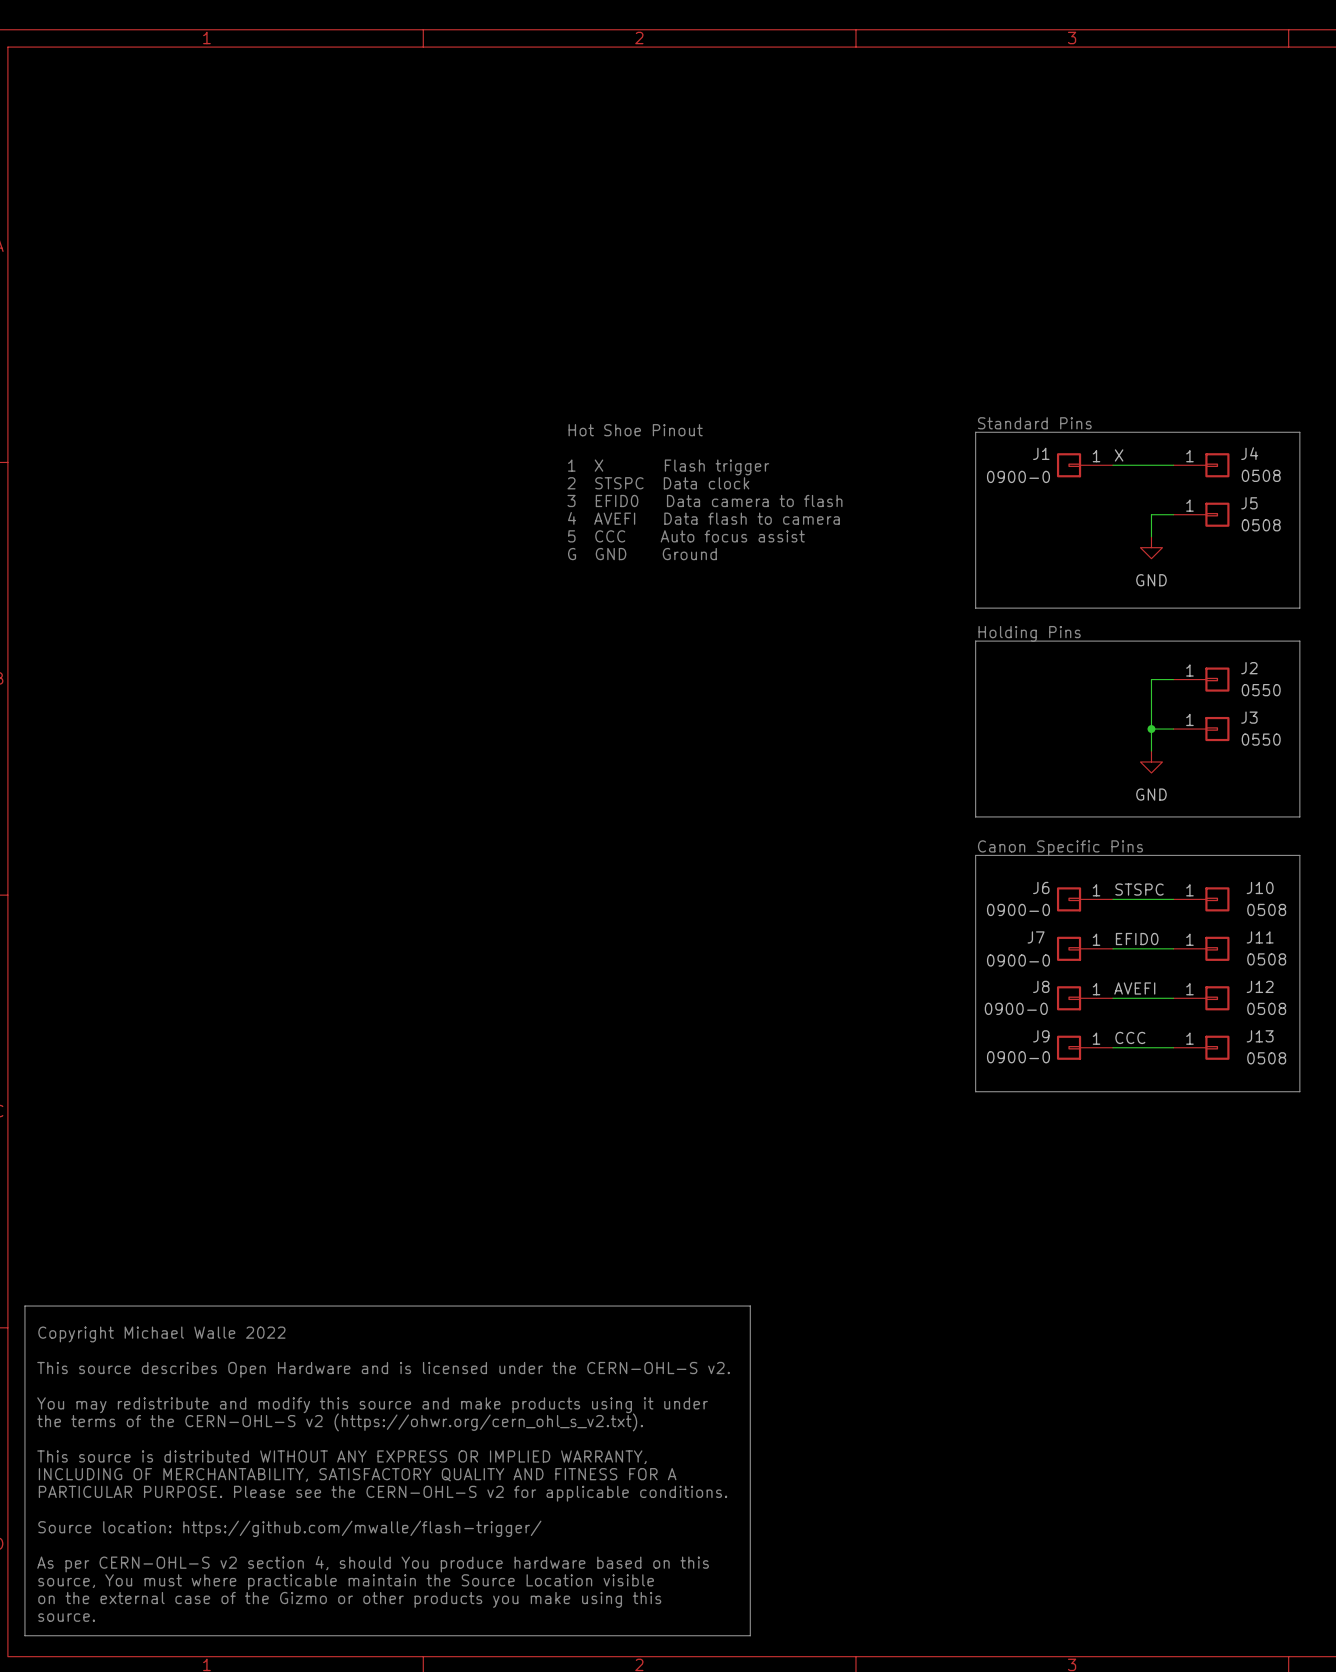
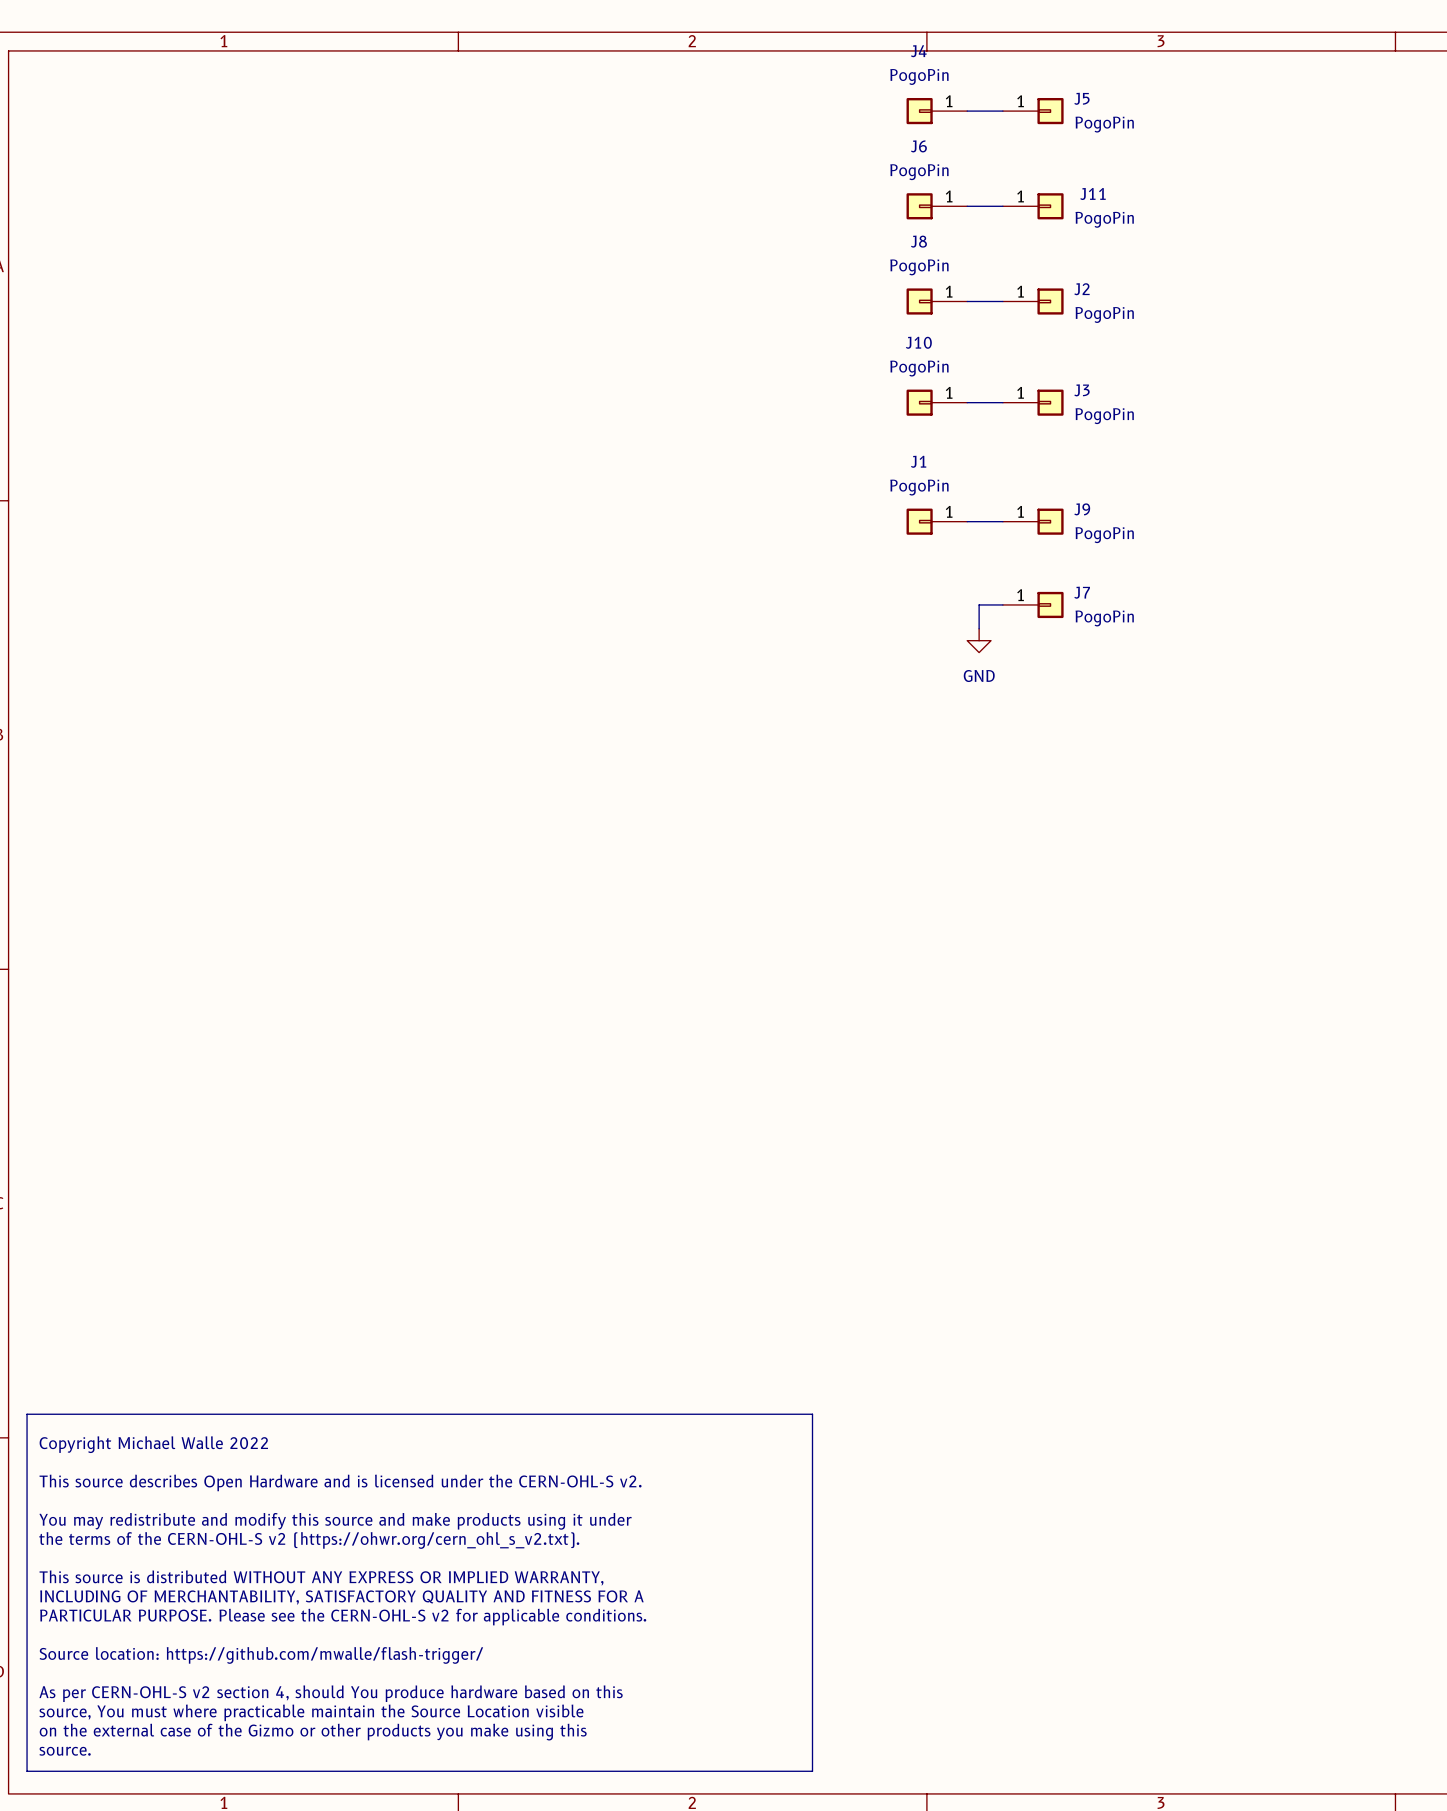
wire: none -> (967, 111) (1002, 111)
wire: none -> (967, 206) (1002, 206)
wire: none -> (967, 301) (1002, 301)
wire: none -> (967, 402) (1002, 402)
text: Standard Pins (1034, 423) -> none
text: Hot Shoe Pinout (635, 430) -> none
line: (975, 432) (1299, 432) (1299, 608) (975, 608) (975, 432) -> none
J1 name position: J1 (1041, 453) -> J1 (918, 461)
J4 name position: J4 (1249, 453) -> J4 (918, 51)
label: X (1119, 455) -> none
J1 position: (1084, 465) -> (936, 521)
wire: (1113, 465) (1173, 465) -> none
J4 position: (1201, 465) -> (936, 111)
J4 rotation: 0° (1217, 465) -> 180° (919, 111)
text: 1 X Flash trigger (668, 467) -> none
J4 value: 0508 (1261, 475) -> PogoPin (919, 76)
J1 value: 0900-0 (1018, 476) -> PogoPin (919, 487)
wire: none -> (967, 521) (1002, 521)
text: 2 STSPC Data clock (658, 483) -> none
text: 3 EFID0 Data camera to flash (704, 500) -> none
wire: (1173, 514) (1151, 514) (1151, 536) -> none
J5 position: (1201, 514) -> (1033, 111)
text: 4 AVEFI Data flash to camera (703, 518) -> none
J5 value: 0508 (1261, 525) -> PogoPin (1104, 124)
text: 5 CCC Auto focus assist (686, 536) -> none
power symbol: GND (1151, 547) -> none
text: G GND Ground (642, 554) -> none
wire: none -> (1002, 604) (979, 604) (979, 628)
power symbol: none -> GND (979, 640)
text: Holding Pins (1029, 633) -> none
line: (975, 641) (1299, 641) (1299, 816) (975, 816) (975, 641) -> none
wire: (1173, 679) (1151, 679) (1151, 751) -> none
J2 position: (1201, 679) -> (1033, 301)
J2 value: 0550 (1261, 690) -> PogoPin (1104, 315)
wire: (1151, 729) (1173, 729) -> none
junction: (1151, 729) -> none
J3 position: (1201, 729) -> (1033, 402)
J3 value: 0550 (1261, 739) -> PogoPin (1104, 416)
power symbol: GND (1151, 762) -> none
text: Canon Specific Pins (1060, 848) -> none
line: (975, 855) (975, 1091) (1299, 1091) (1299, 855) (975, 855) -> none
J6 name position: J6 (1041, 887) -> J6 (918, 146)
J10 name position: J10 (1260, 887) -> J10 (918, 342)
label: STSPC (1139, 889) -> none
J6 position: (1084, 899) -> (936, 206)
wire: (1113, 899) (1173, 899) -> none
J10 position: (1201, 899) -> (936, 402)
J10 rotation: 0° (1217, 899) -> 180° (919, 402)
J6 value: 0900-0 (1018, 909) -> PogoPin (919, 172)
J10 value: 0508 (1266, 909) -> PogoPin (919, 368)
J7 name position: J7 (1036, 937) -> J7 (1082, 592)
label: EFID0 (1137, 939) -> none
J7 rotation: 0° (1069, 948) -> 180° (1050, 604)
J7 position: (1084, 948) -> (1033, 604)
wire: (1113, 948) (1173, 948) -> none
J11 position: (1201, 948) -> (1033, 206)
J11 value: 0508 (1266, 959) -> PogoPin (1104, 219)
J7 value: 0900-0 (1018, 960) -> PogoPin (1104, 618)
J8 name position: J8 (1041, 986) -> J8 (918, 241)
label: AVEFI (1134, 988) -> none
J8 position: (1084, 998) -> (936, 301)
wire: (1113, 998) (1173, 998) -> none
J12: 0508 (1201, 998) -> none
J8 value: 0900-0 (1016, 1008) -> PogoPin (919, 267)
J9 name position: J9 (1041, 1036) -> J9 (1082, 509)
label: CCC (1130, 1037) -> none
J9 rotation: 0° (1069, 1047) -> 180° (1050, 521)
J9 position: (1084, 1047) -> (1033, 521)
wire: (1113, 1047) (1173, 1047) -> none
J13: 0508 (1201, 1047) -> none
J9 value: 0900-0 (1018, 1057) -> PogoPin (1104, 535)

